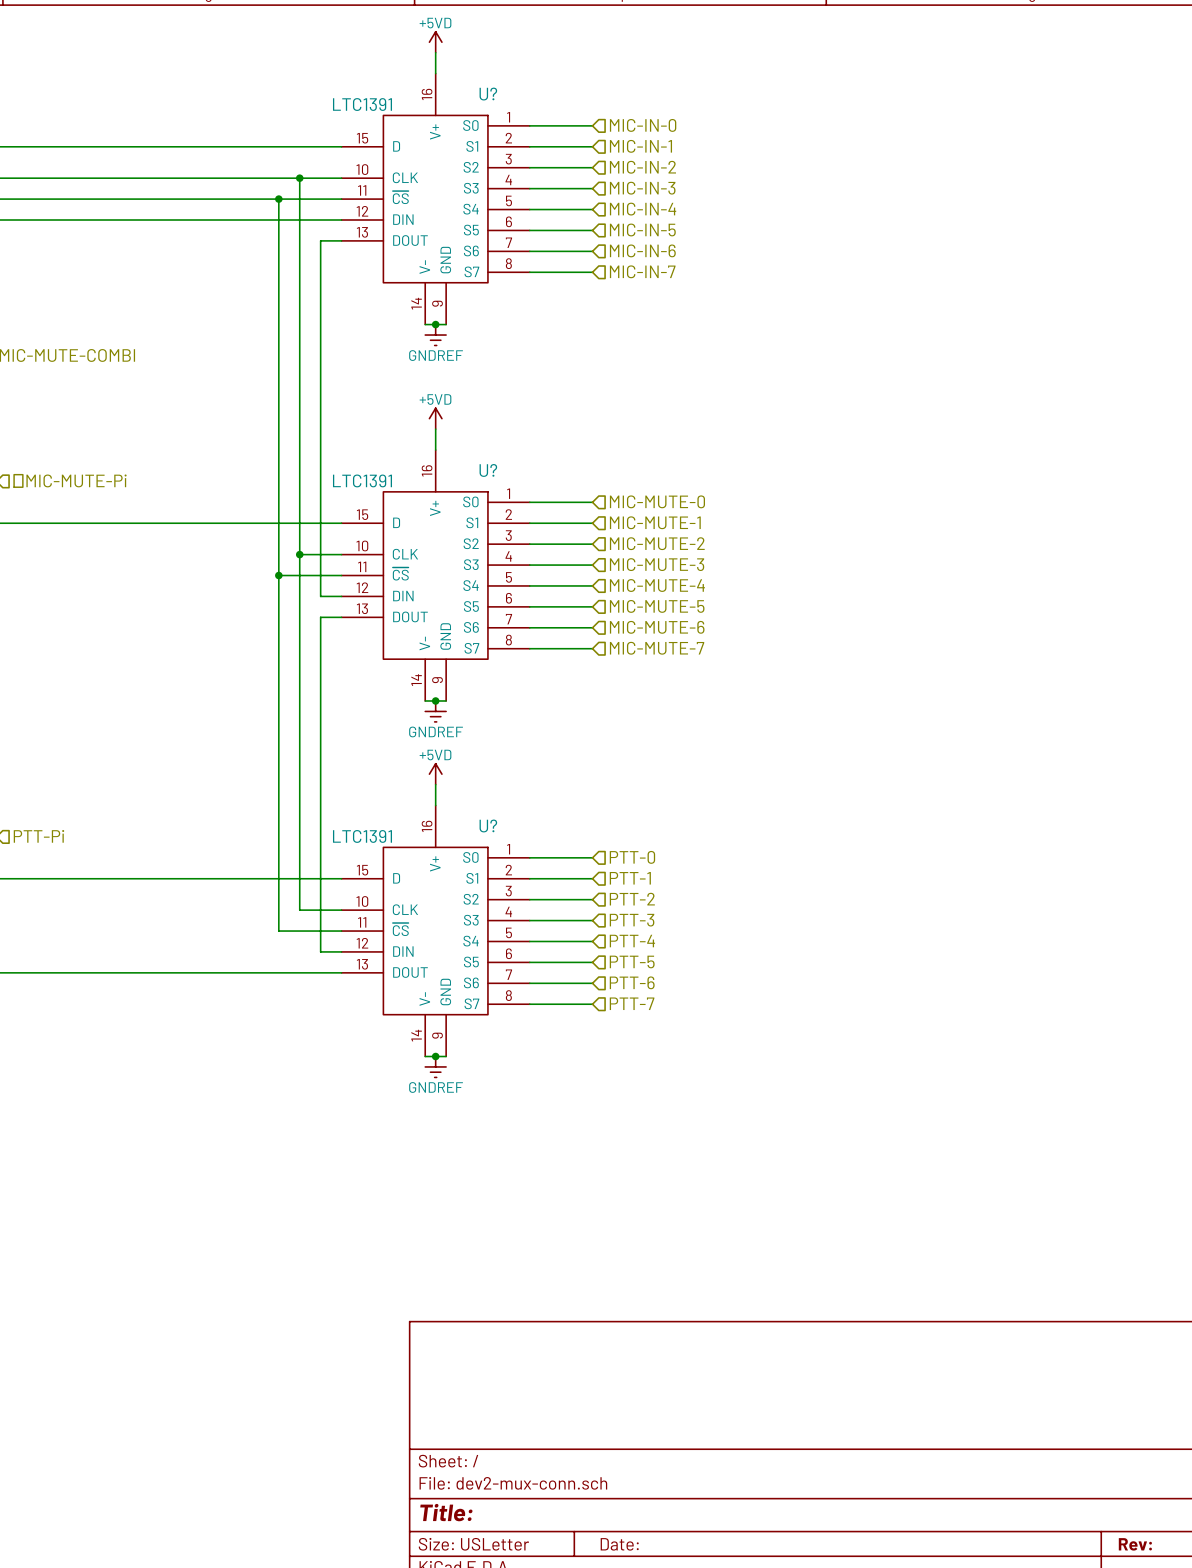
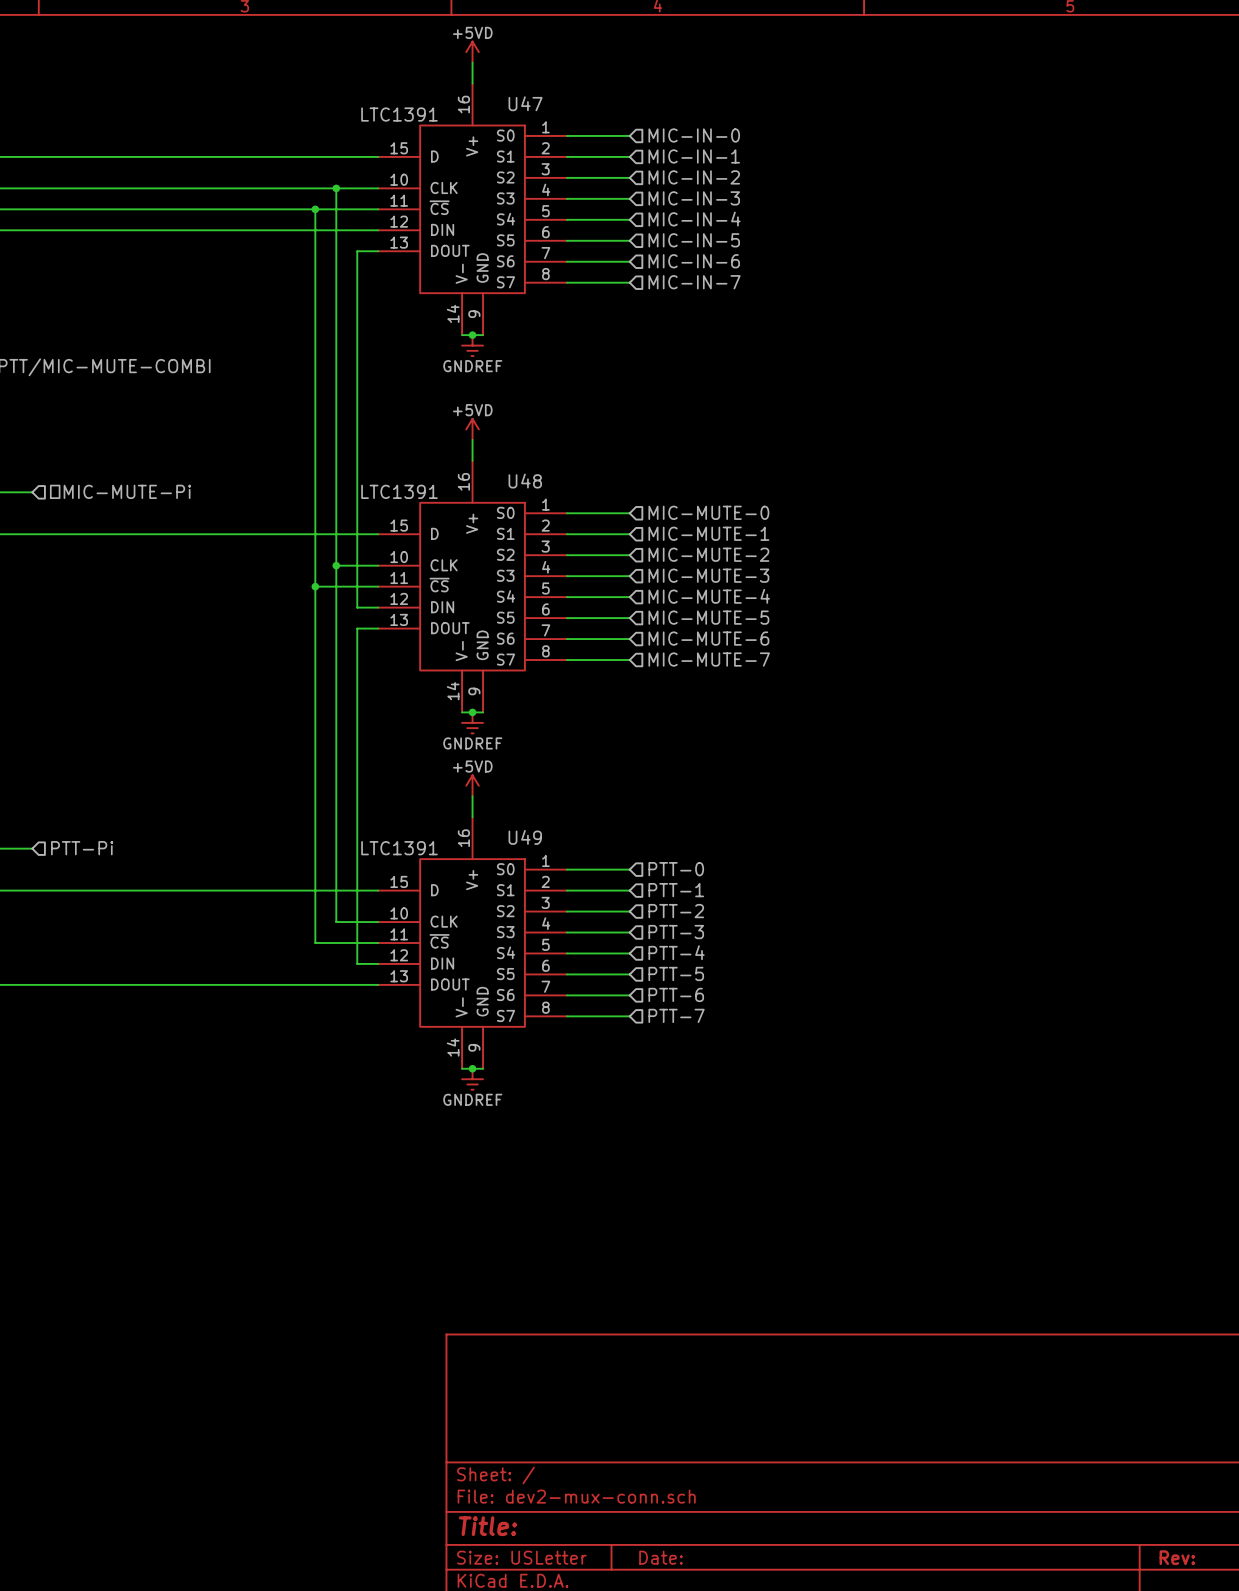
U? name: U? (488, 94) -> U47 (525, 103)
U? name: U? (488, 470) -> U48 (525, 481)
U? name: U? (488, 825) -> U49 (525, 837)

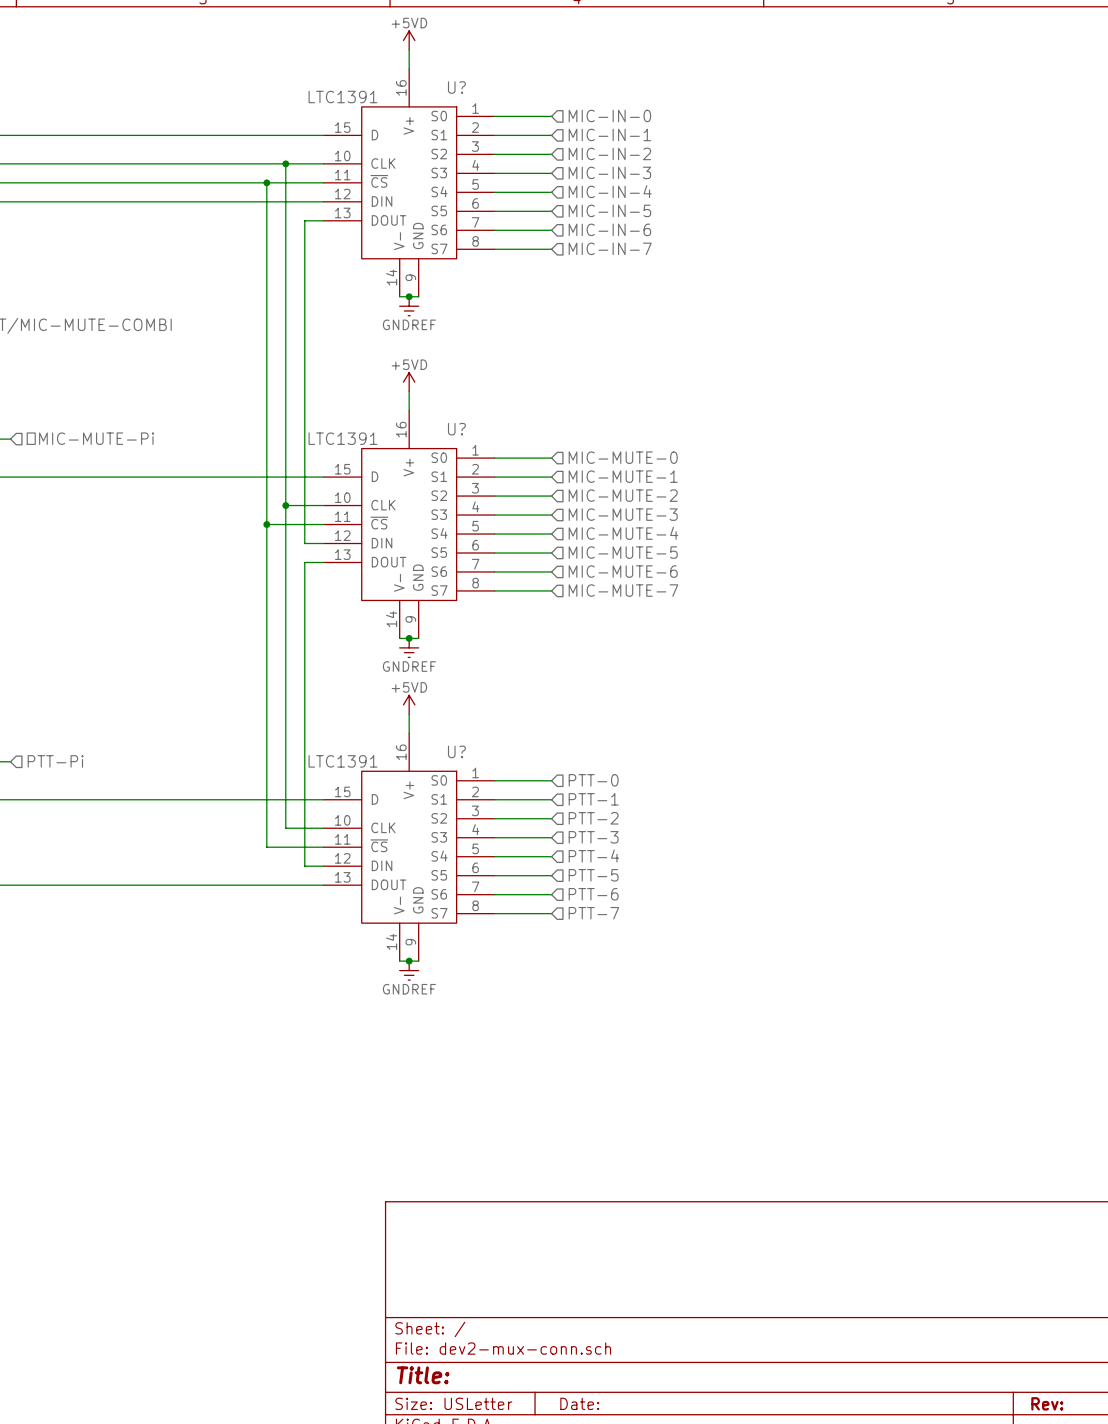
U47 name: U47 (525, 103) -> U? (456, 87)
U48 name: U48 (525, 481) -> U? (456, 429)
U49 name: U49 (525, 837) -> U? (456, 751)

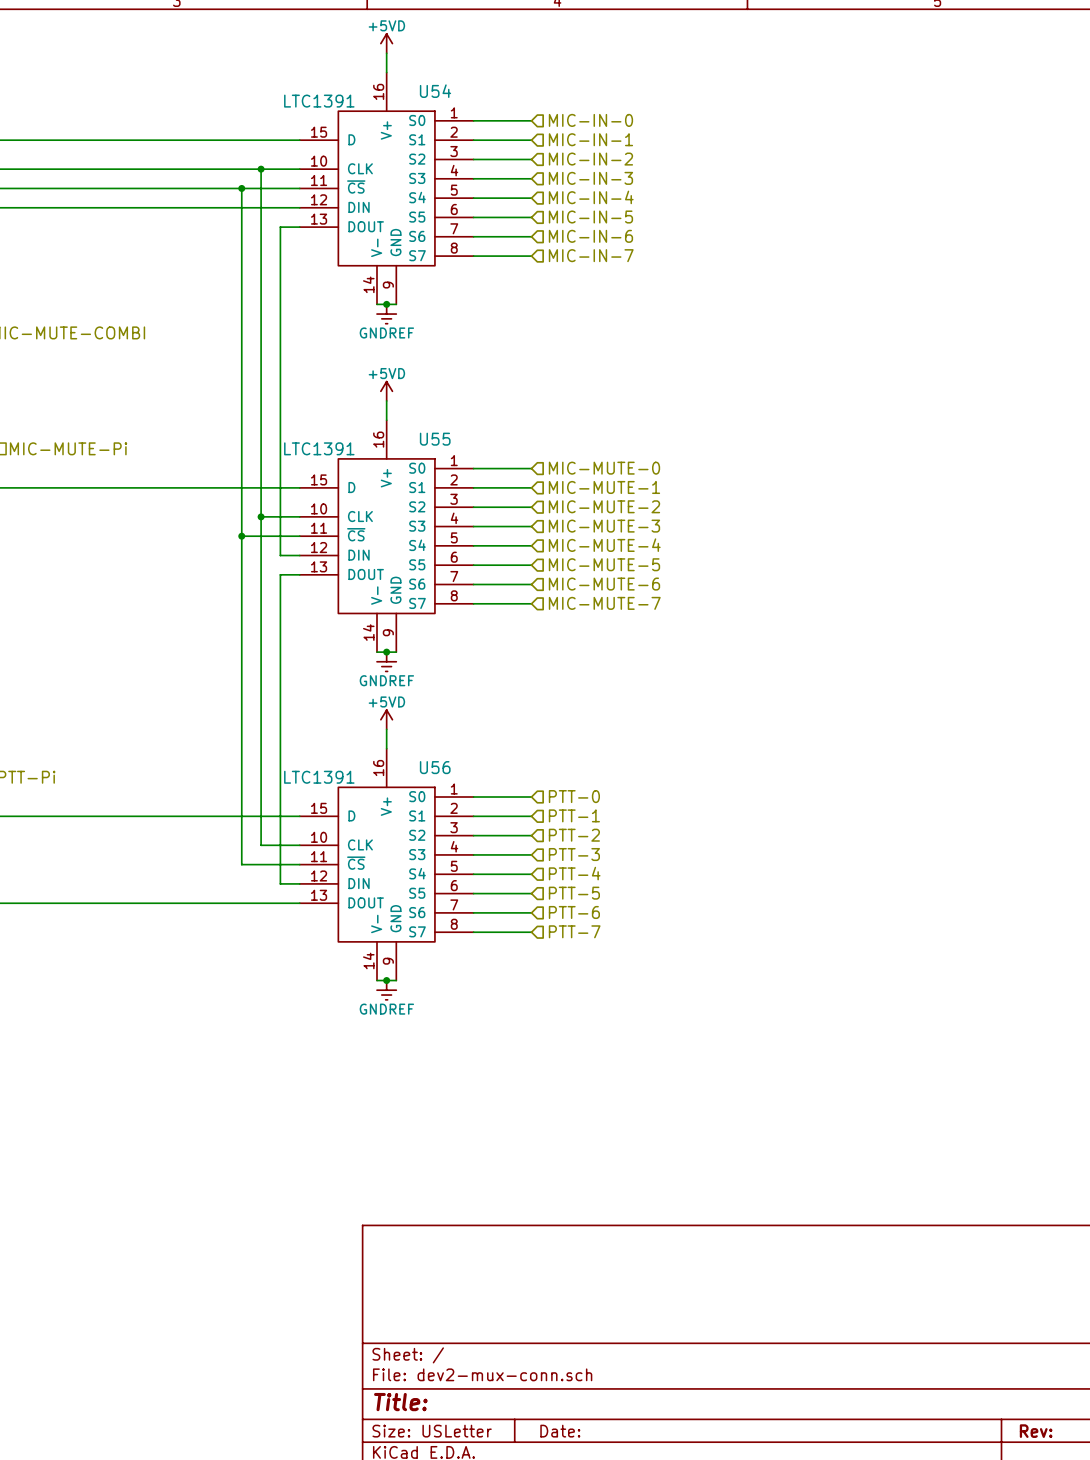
U? name: U? (456, 87) -> U54 (435, 91)
U? name: U? (456, 429) -> U55 (435, 439)
U? name: U? (456, 751) -> U56 (435, 767)

